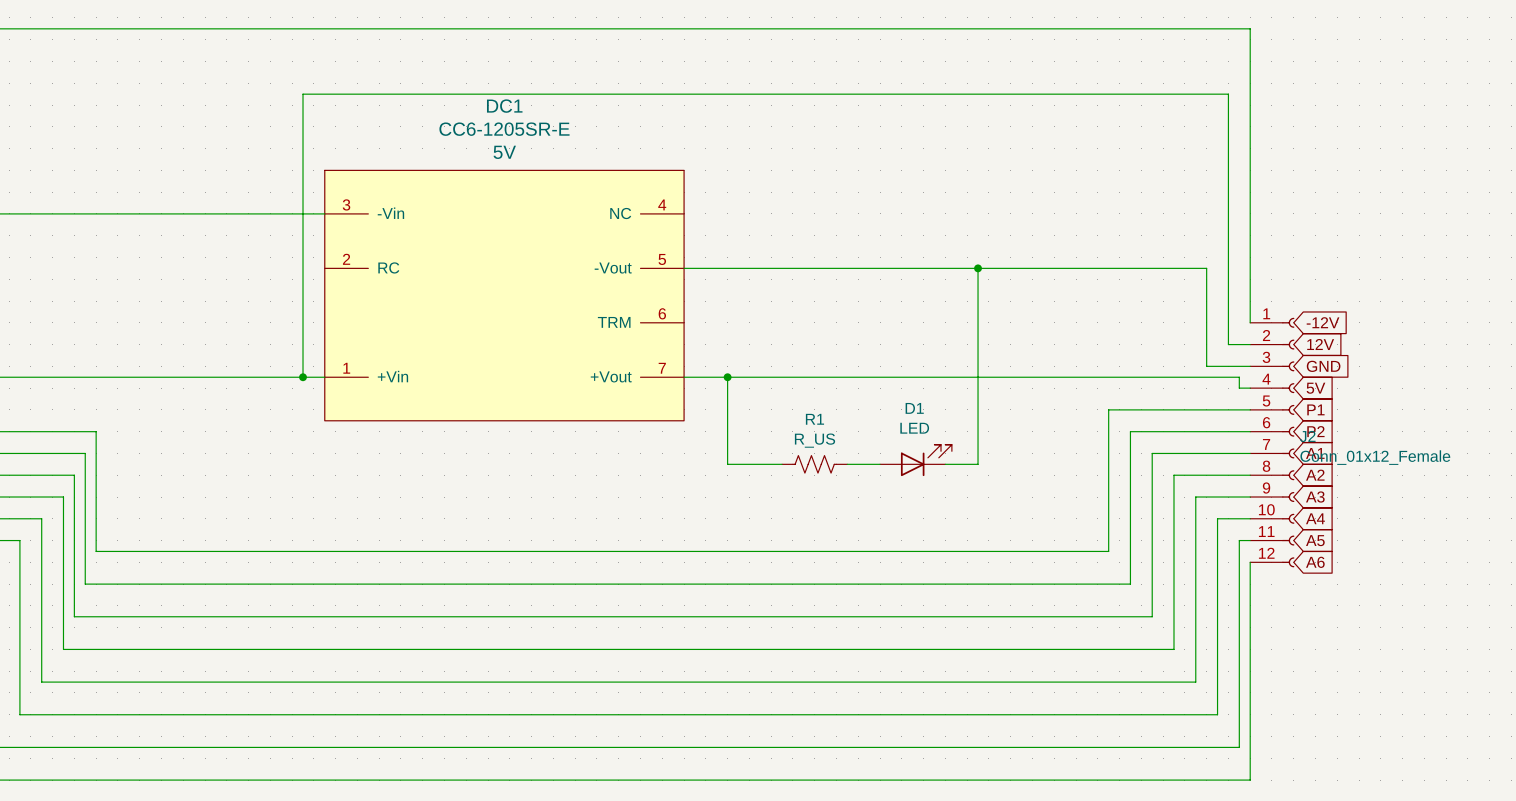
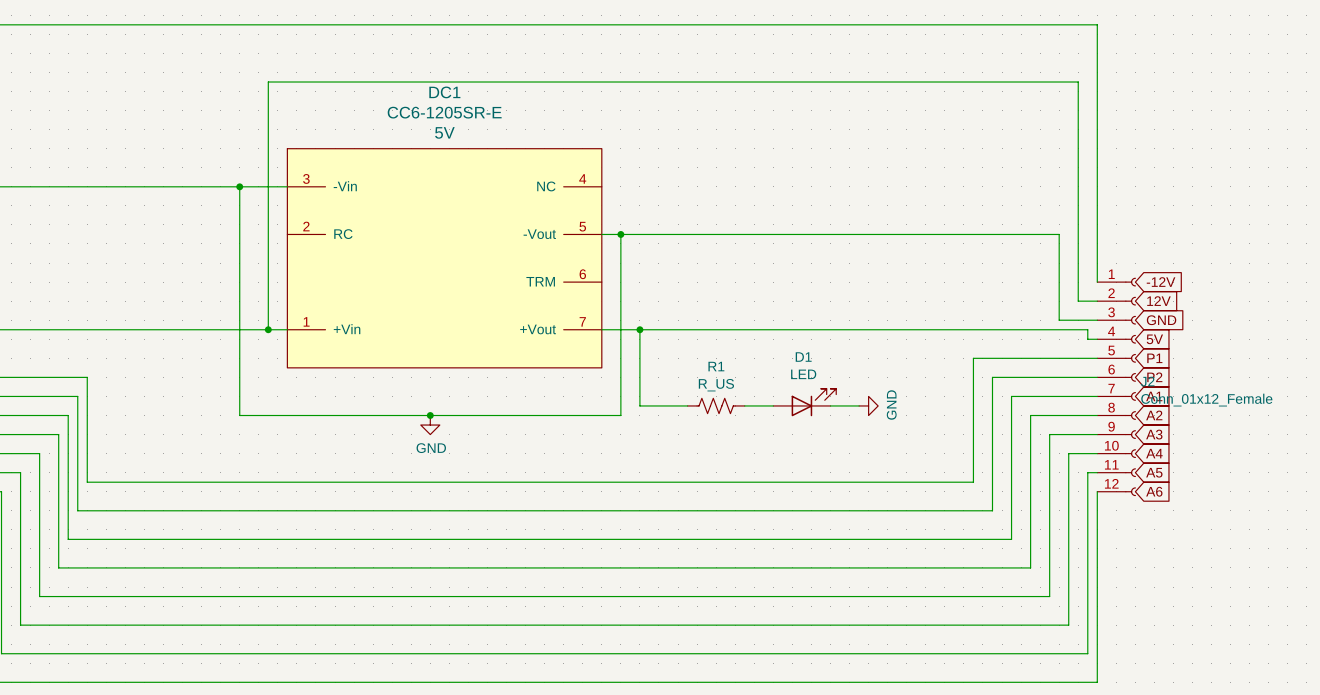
wire: none -> (239, 186) (239, 415) (620, 415) (620, 234)
junction: none -> (239, 186)
junction: none -> (620, 234)
wire: (978, 268) (978, 464) -> none
junction: (978, 268) -> none
power symbol: none -> GND (868, 405)
junction: none -> (430, 415)
power symbol: none -> GND (430, 425)

